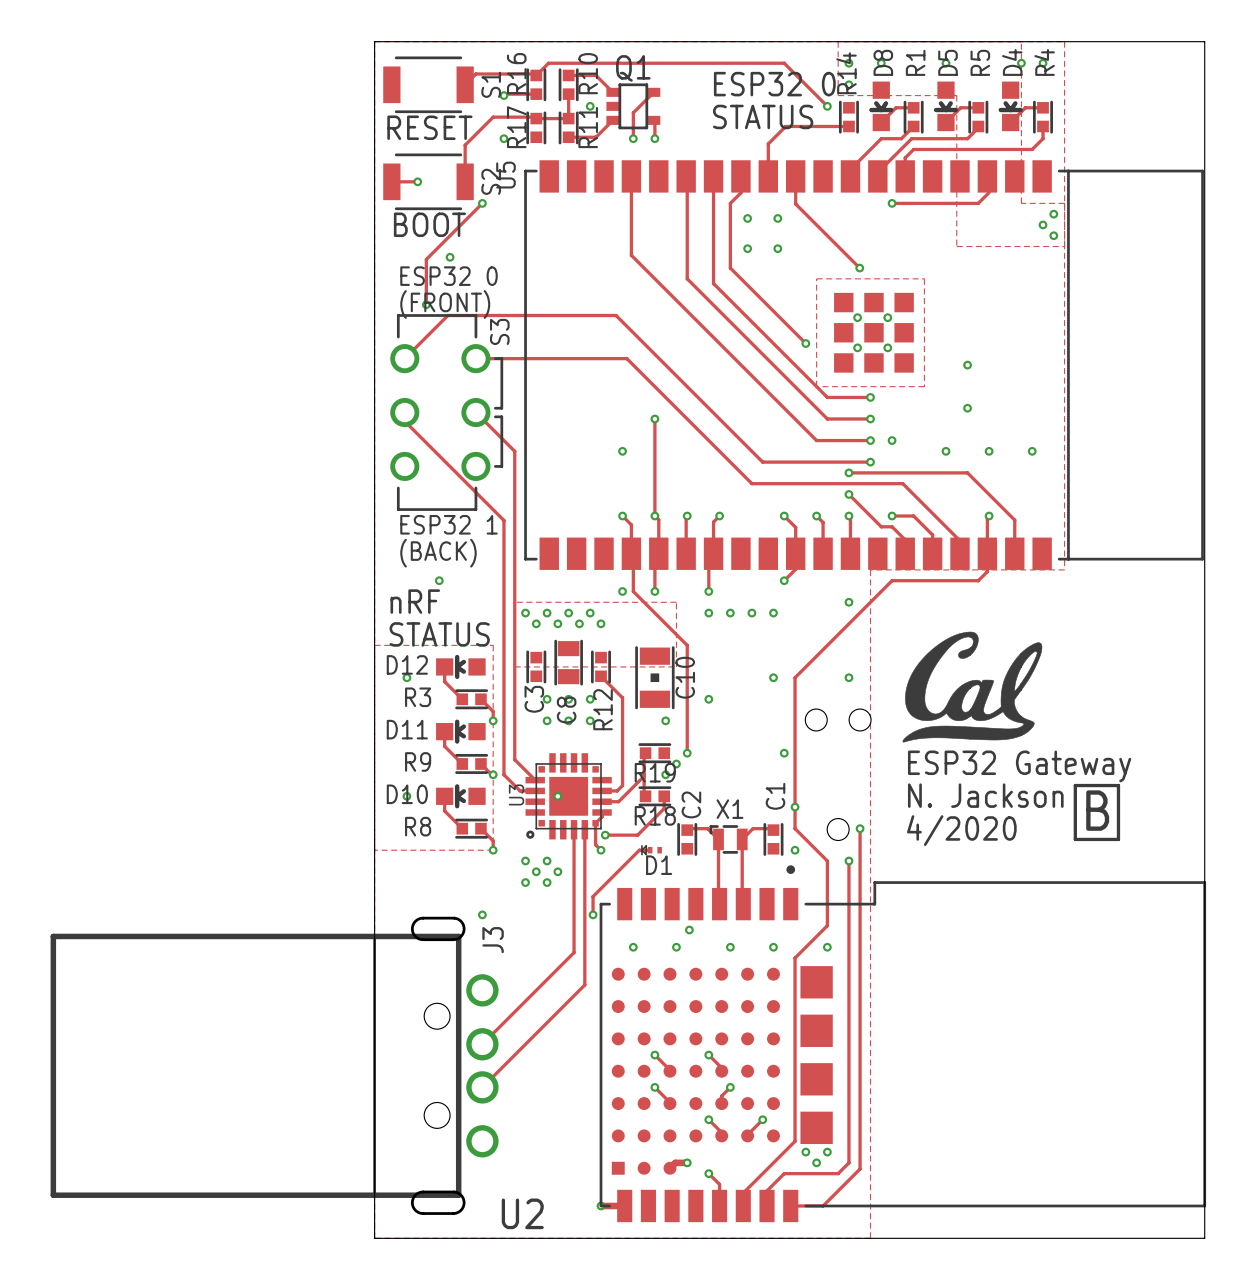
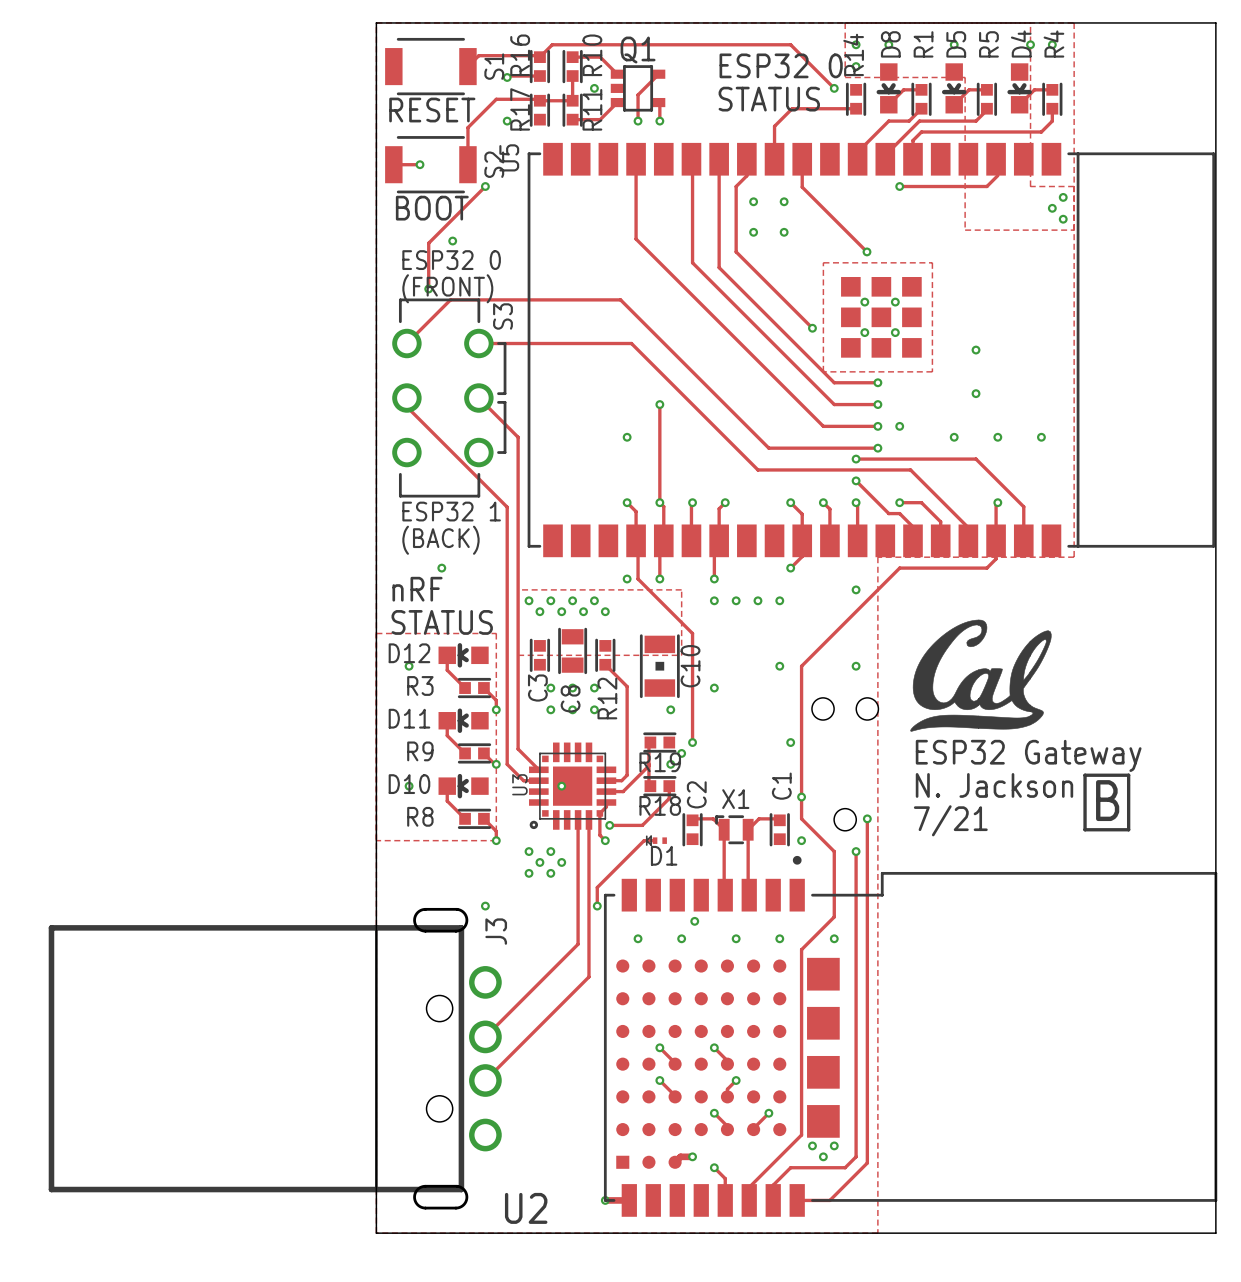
text: 4/2020 (961, 830) -> 7/21 (950, 820)

